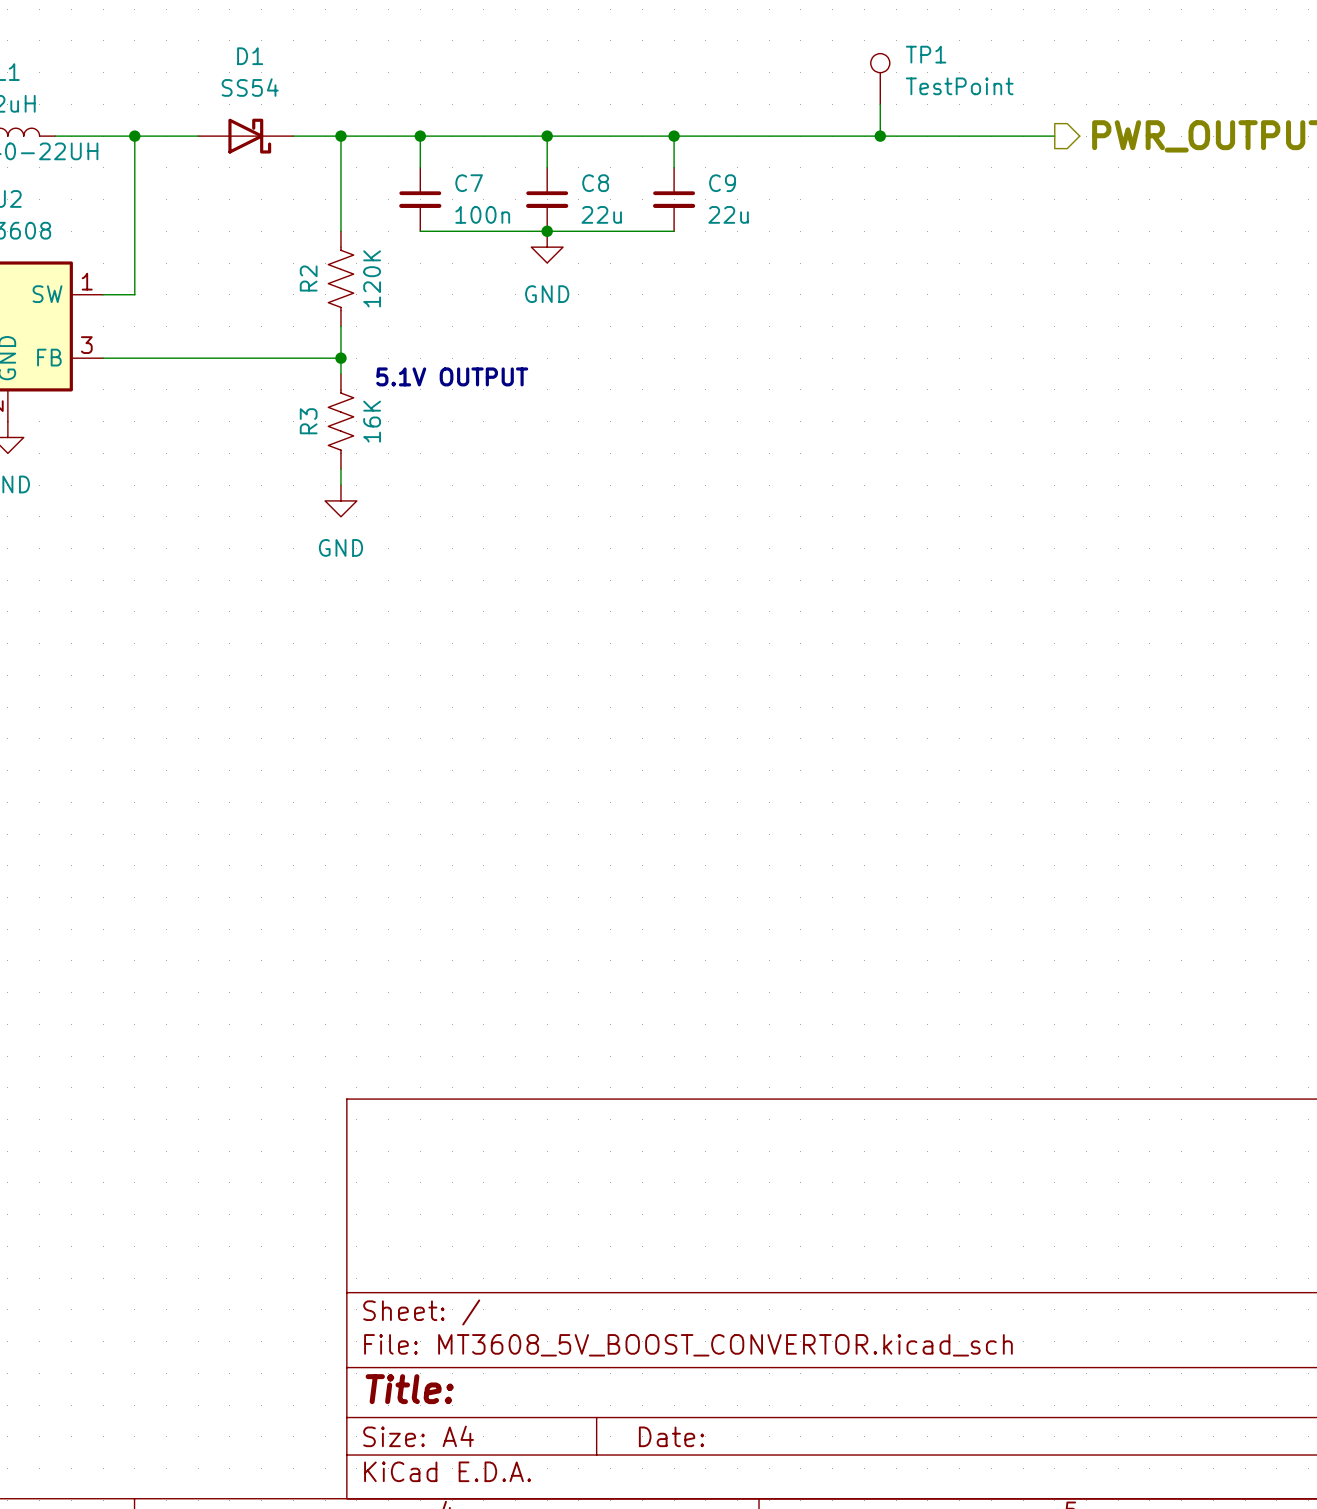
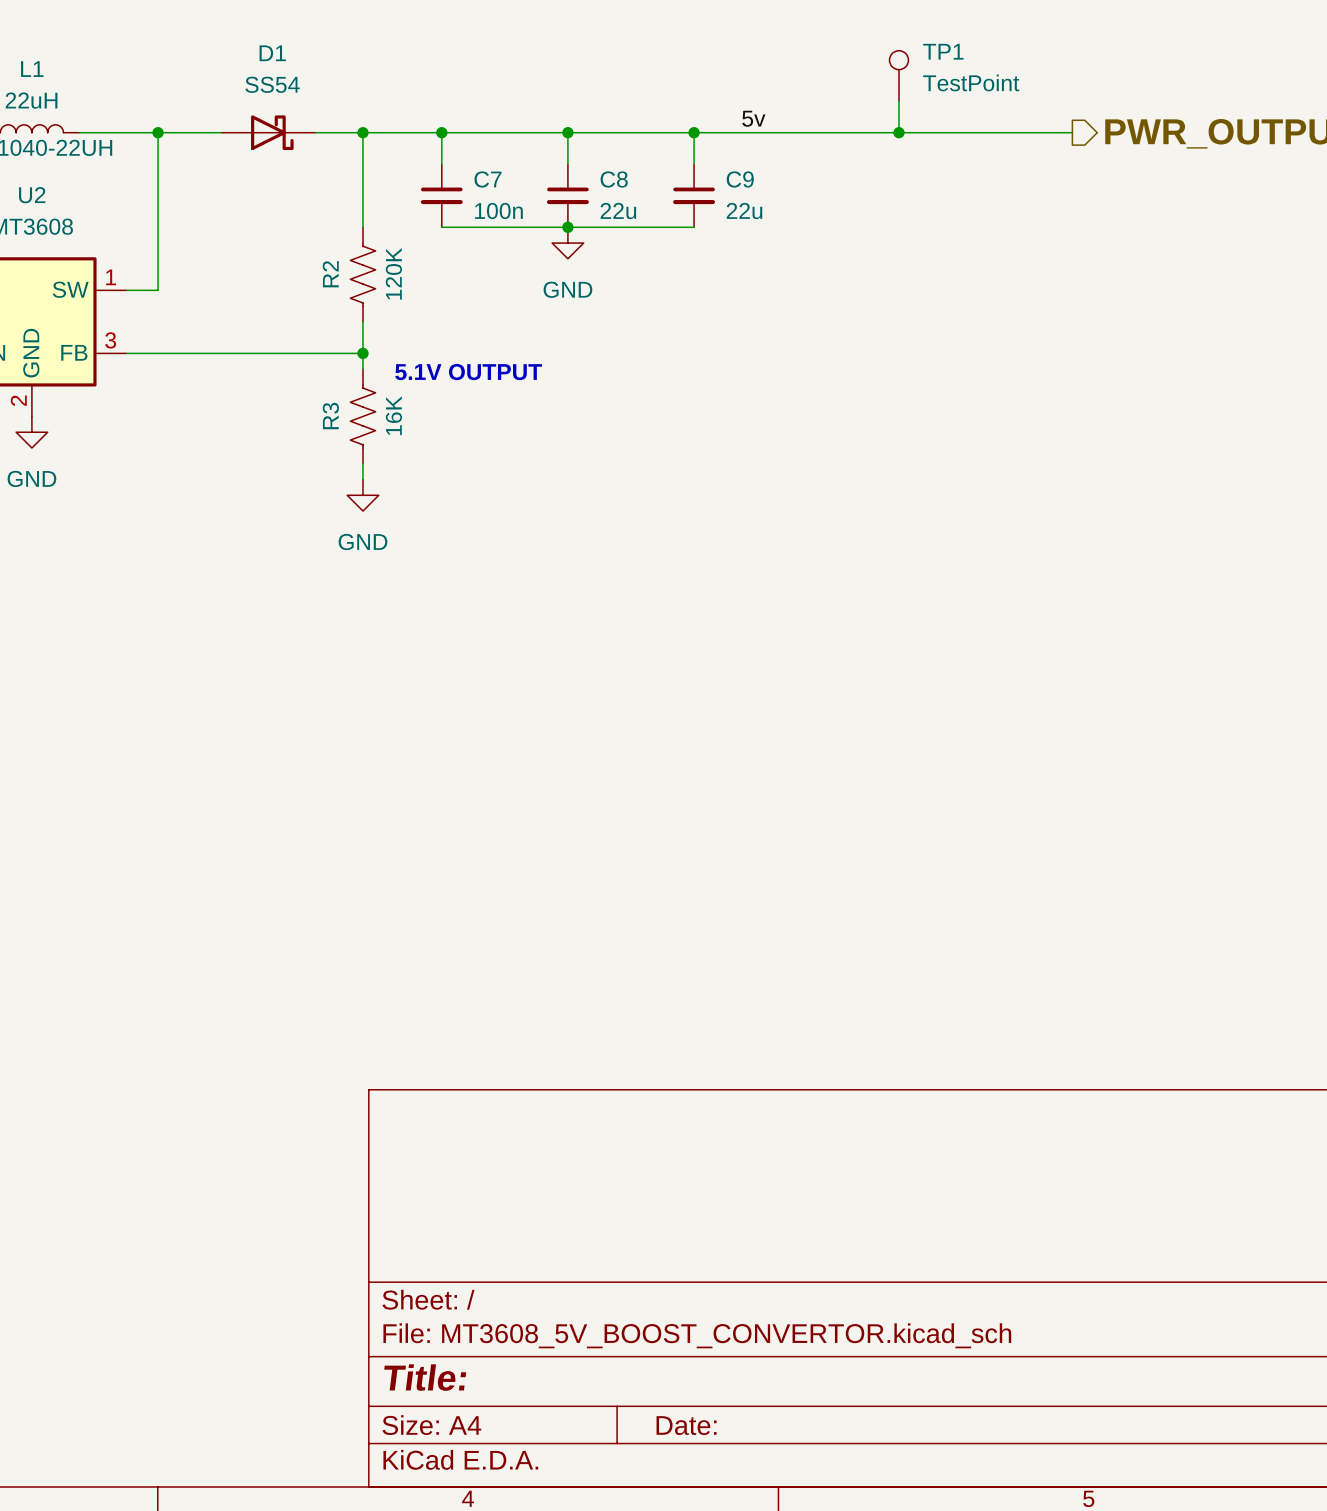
label: none -> 5v (753, 118)

